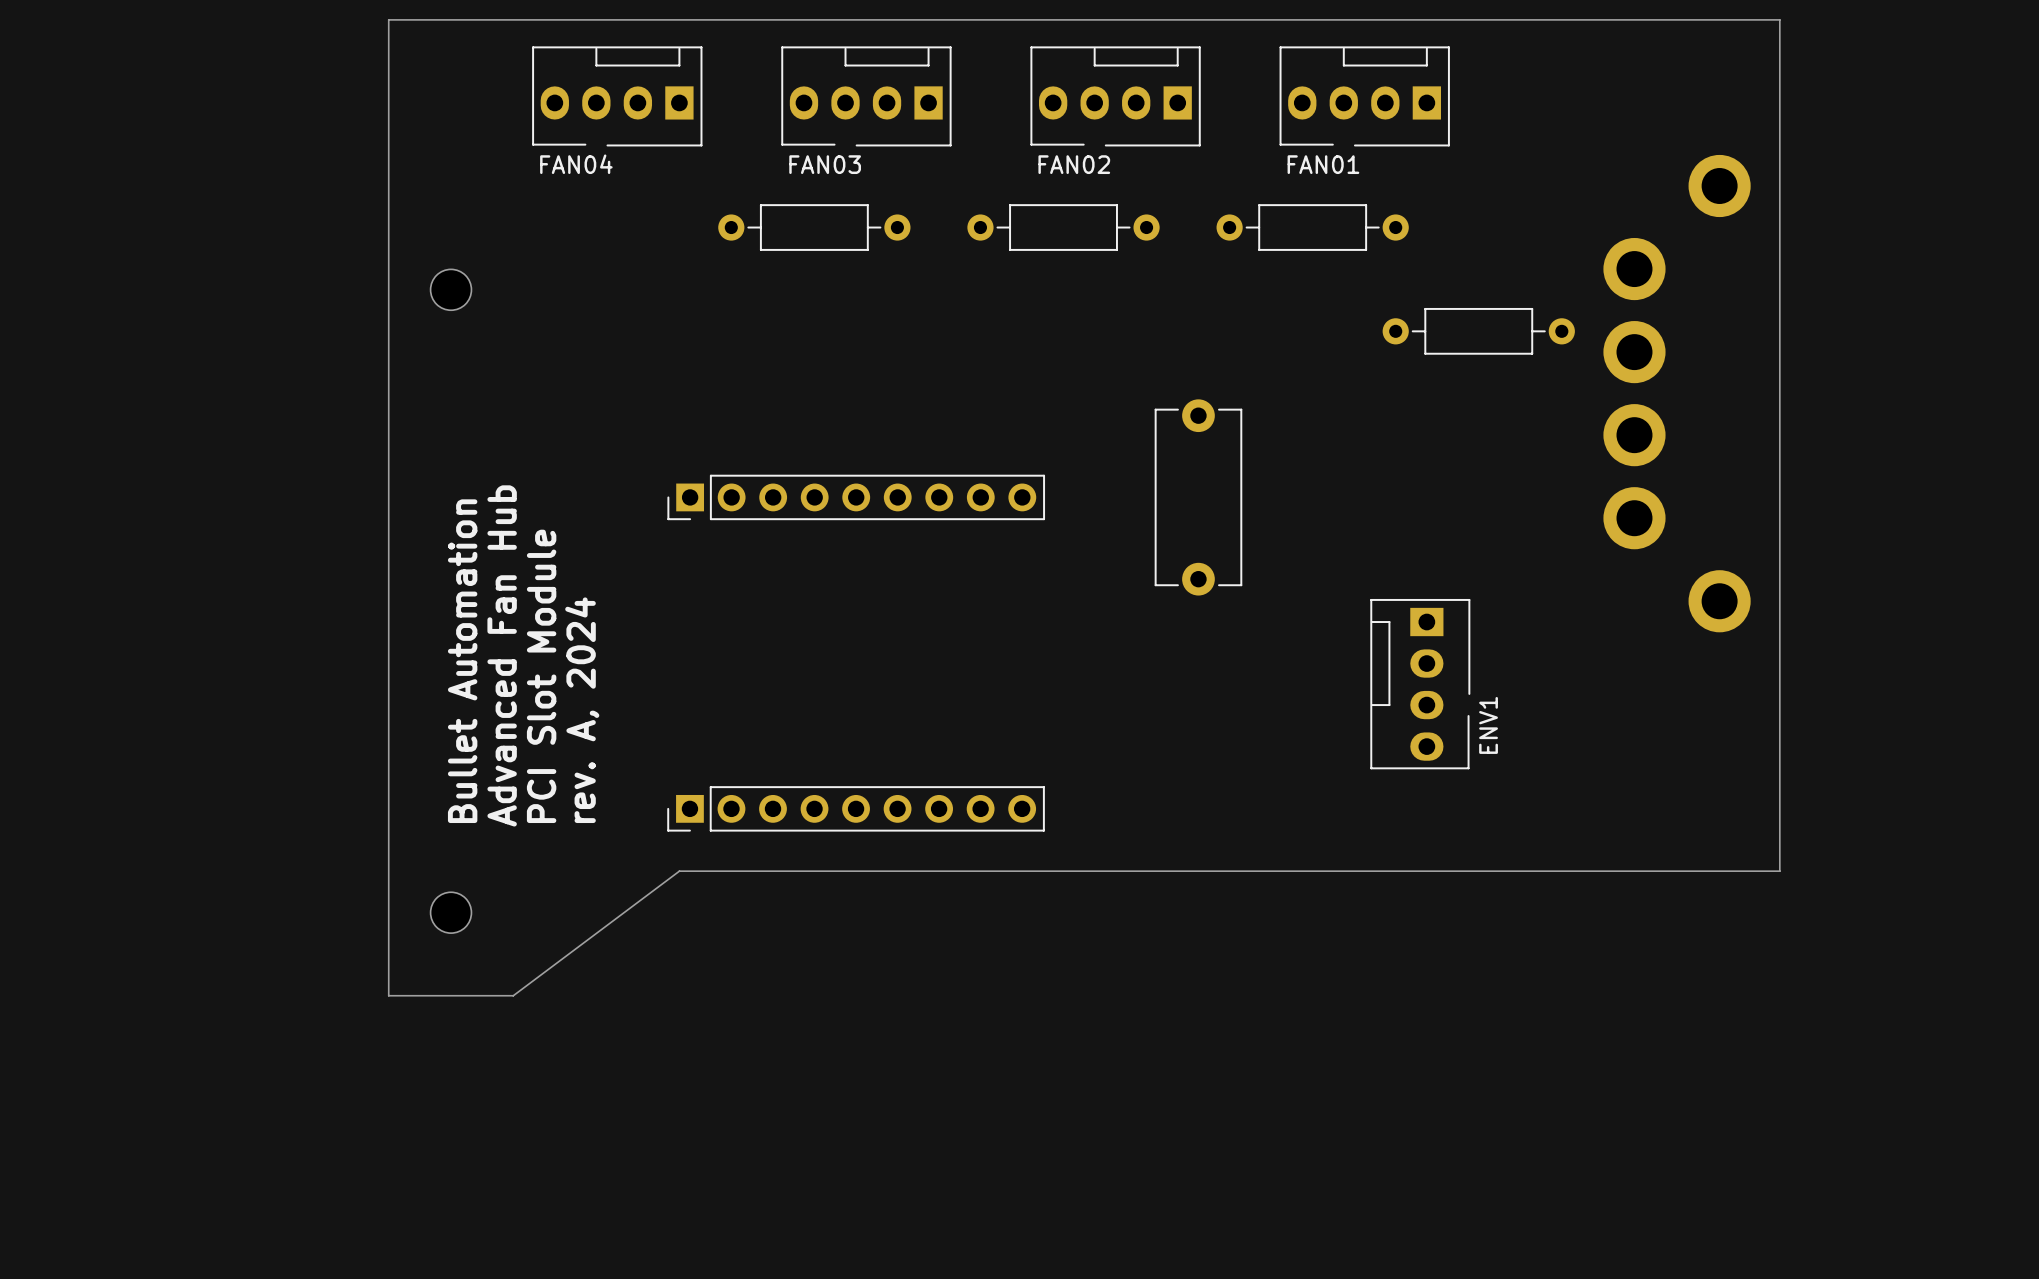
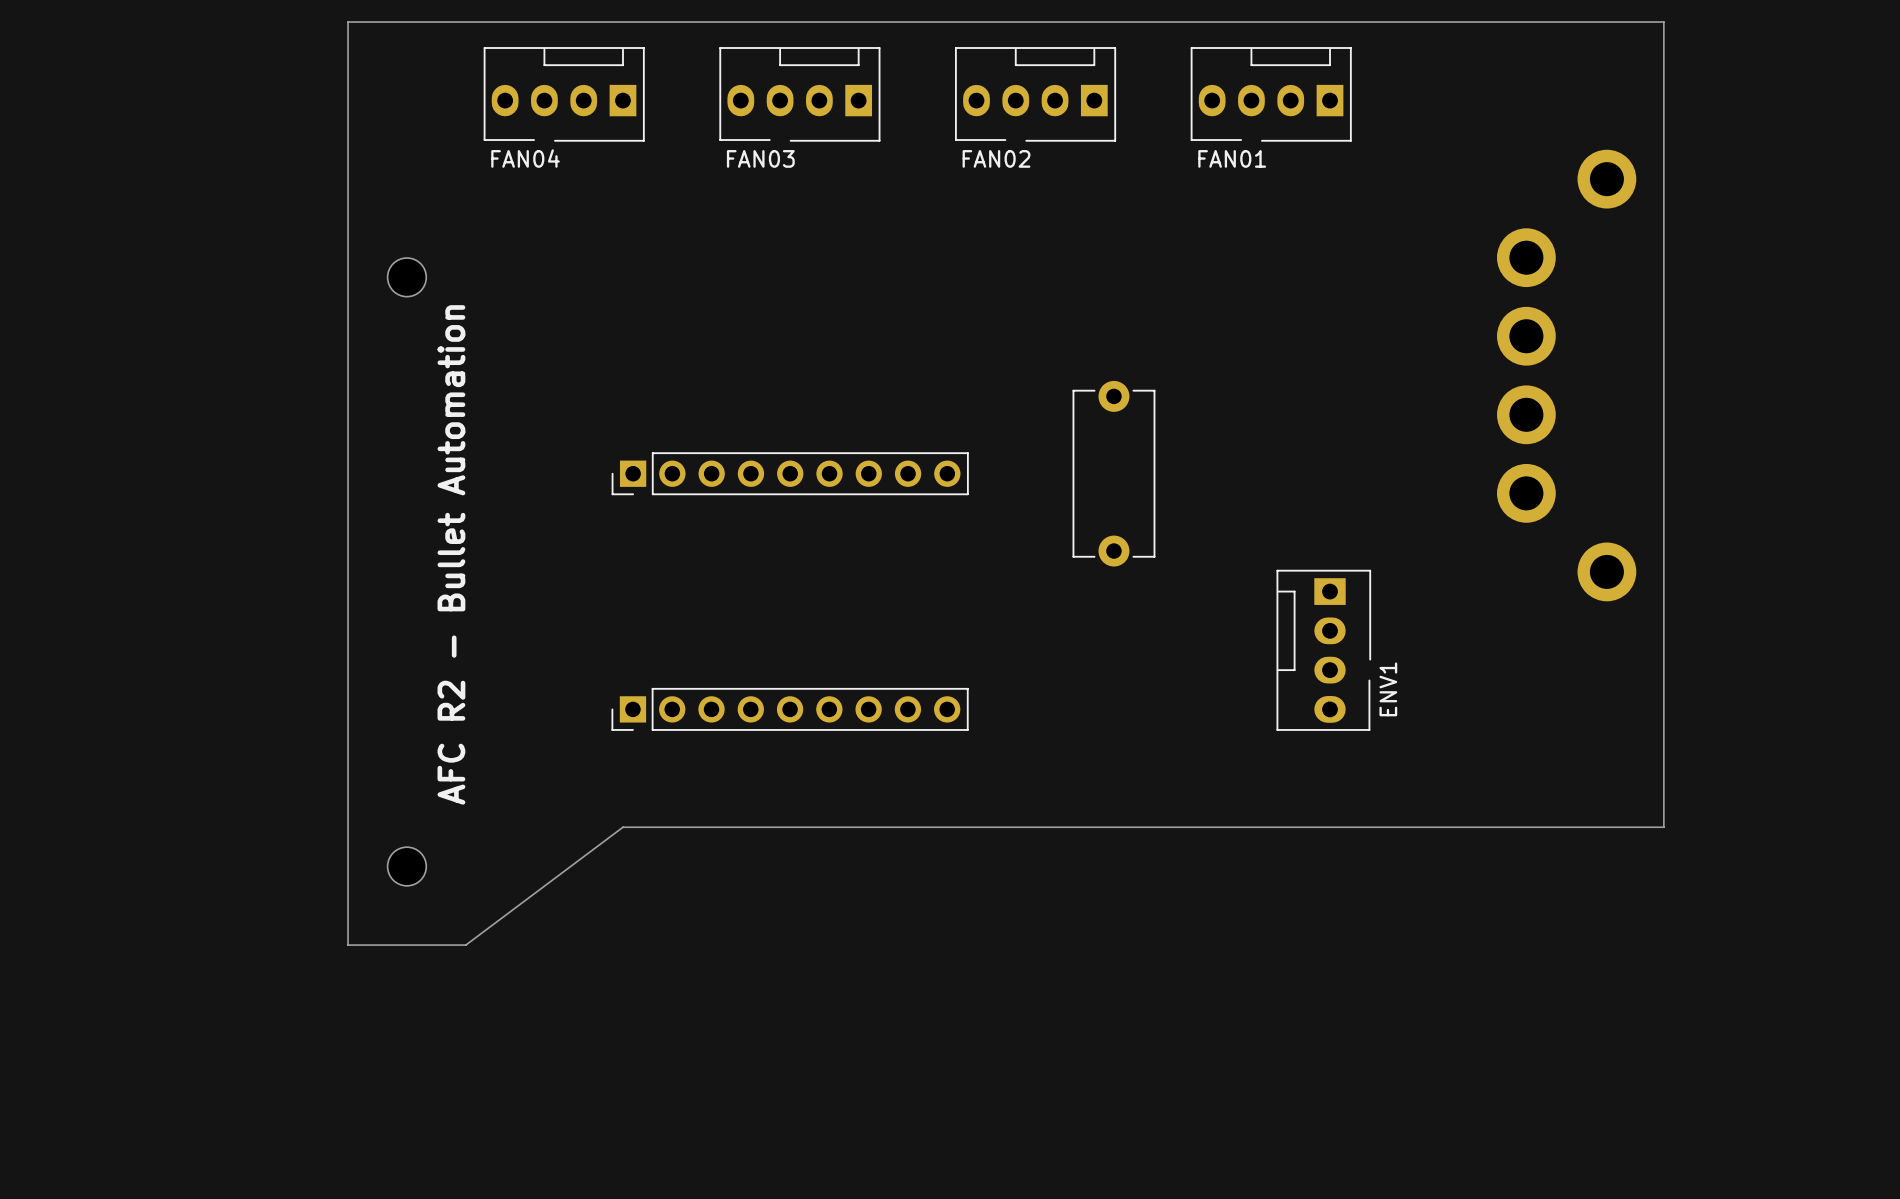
part: (814, 227) -> none
part: (1063, 227) -> none
part: (1312, 227) -> none
part: (1478, 331) -> none
text: Advanced Fan Hub (502, 655) -> none
text: Bullet Automation (462, 661) -> AFC R2 - Bullet Automation (451, 554)
text: PCI Slot Module (541, 676) -> none
text: rev. A, 2024 (582, 710) -> none
part position: (856, 808) -> (790, 709)

